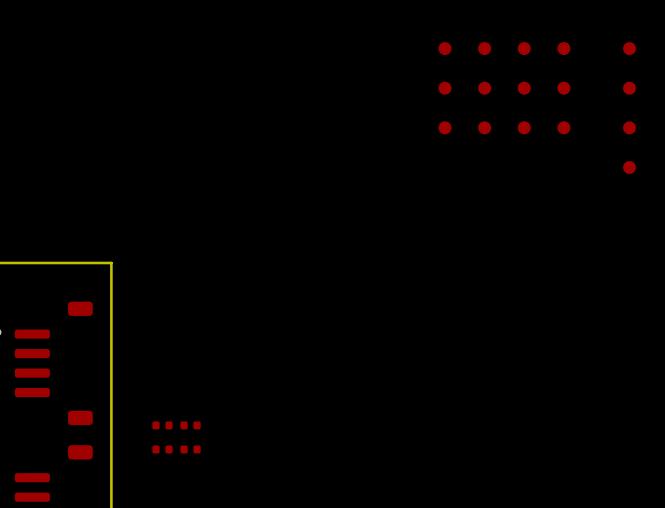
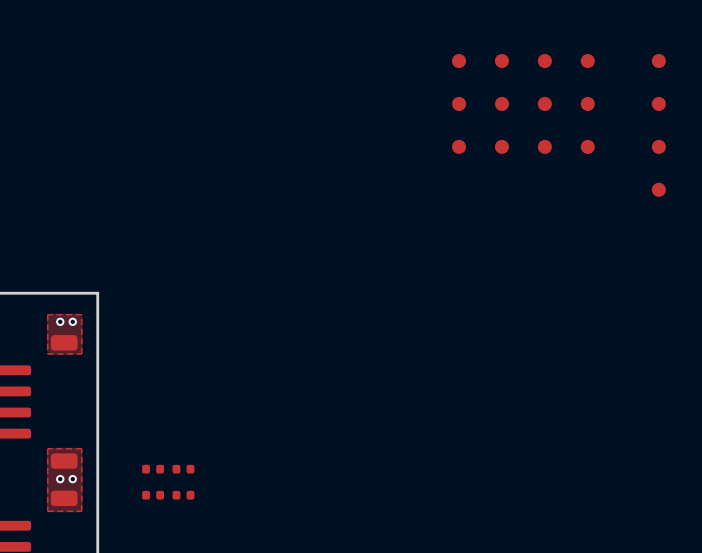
top zone outline: none -> (81, 314) (81, 354) (47, 354) (47, 314) (81, 314)
via: none -> (60, 321)
via: none -> (72, 321)
top zone outline: none -> (81, 448) (81, 511) (47, 511) (47, 448) (81, 448)
via: none -> (60, 479)
via: none -> (72, 479)

